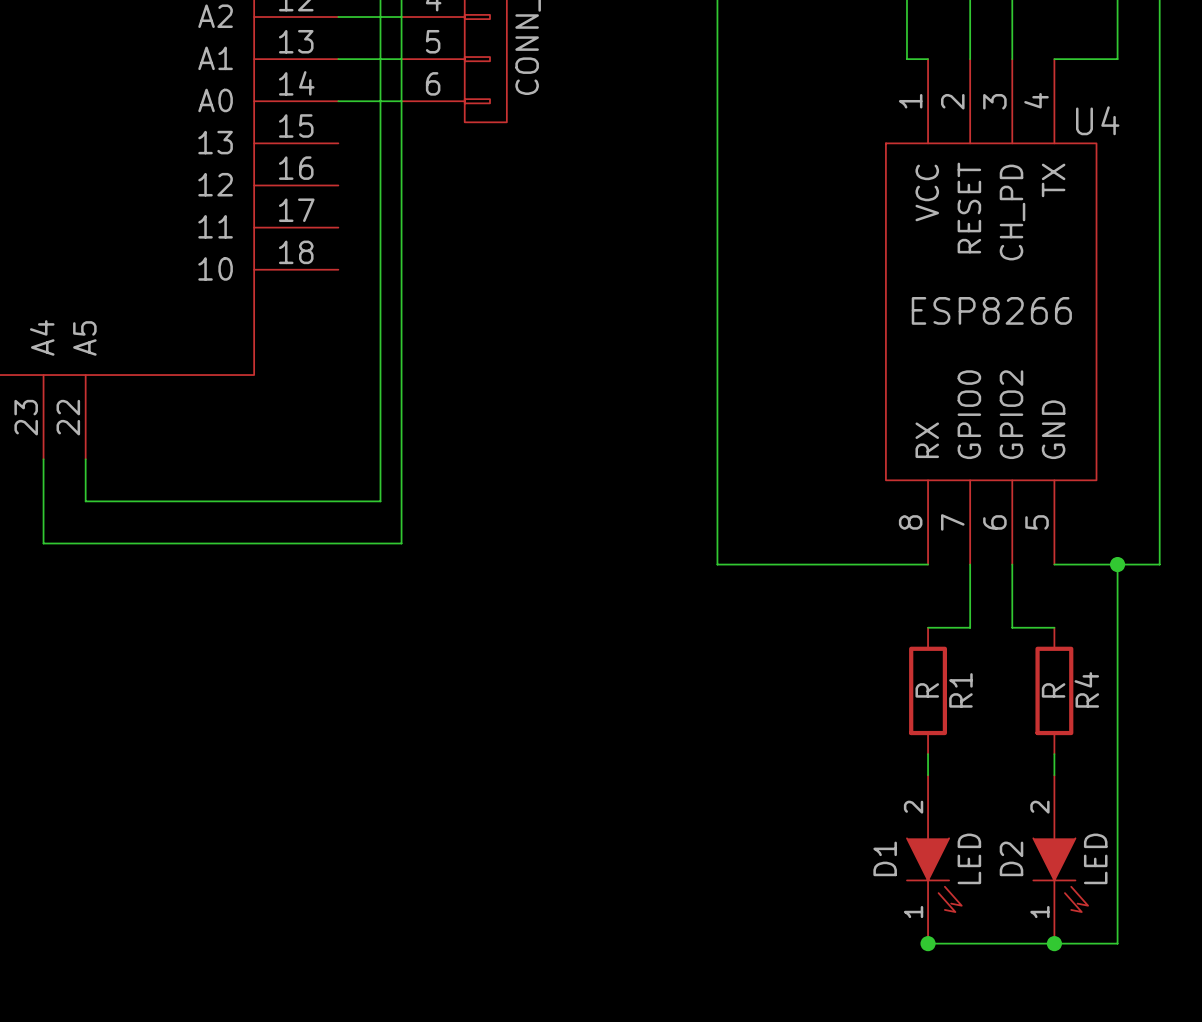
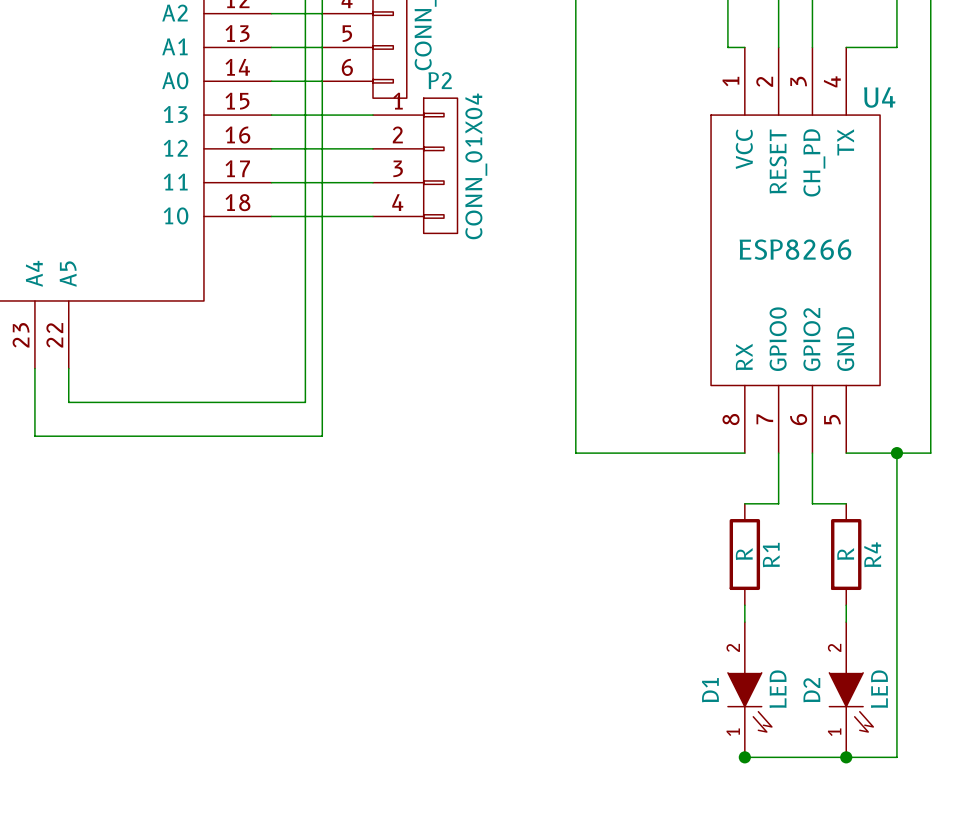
wire: none -> (271, 115) (372, 115)
wire: none -> (271, 148) (372, 148)
P2: none -> CONN_01X04 (415, 165)
wire: none -> (271, 182) (372, 182)
wire: none -> (271, 216) (372, 216)

